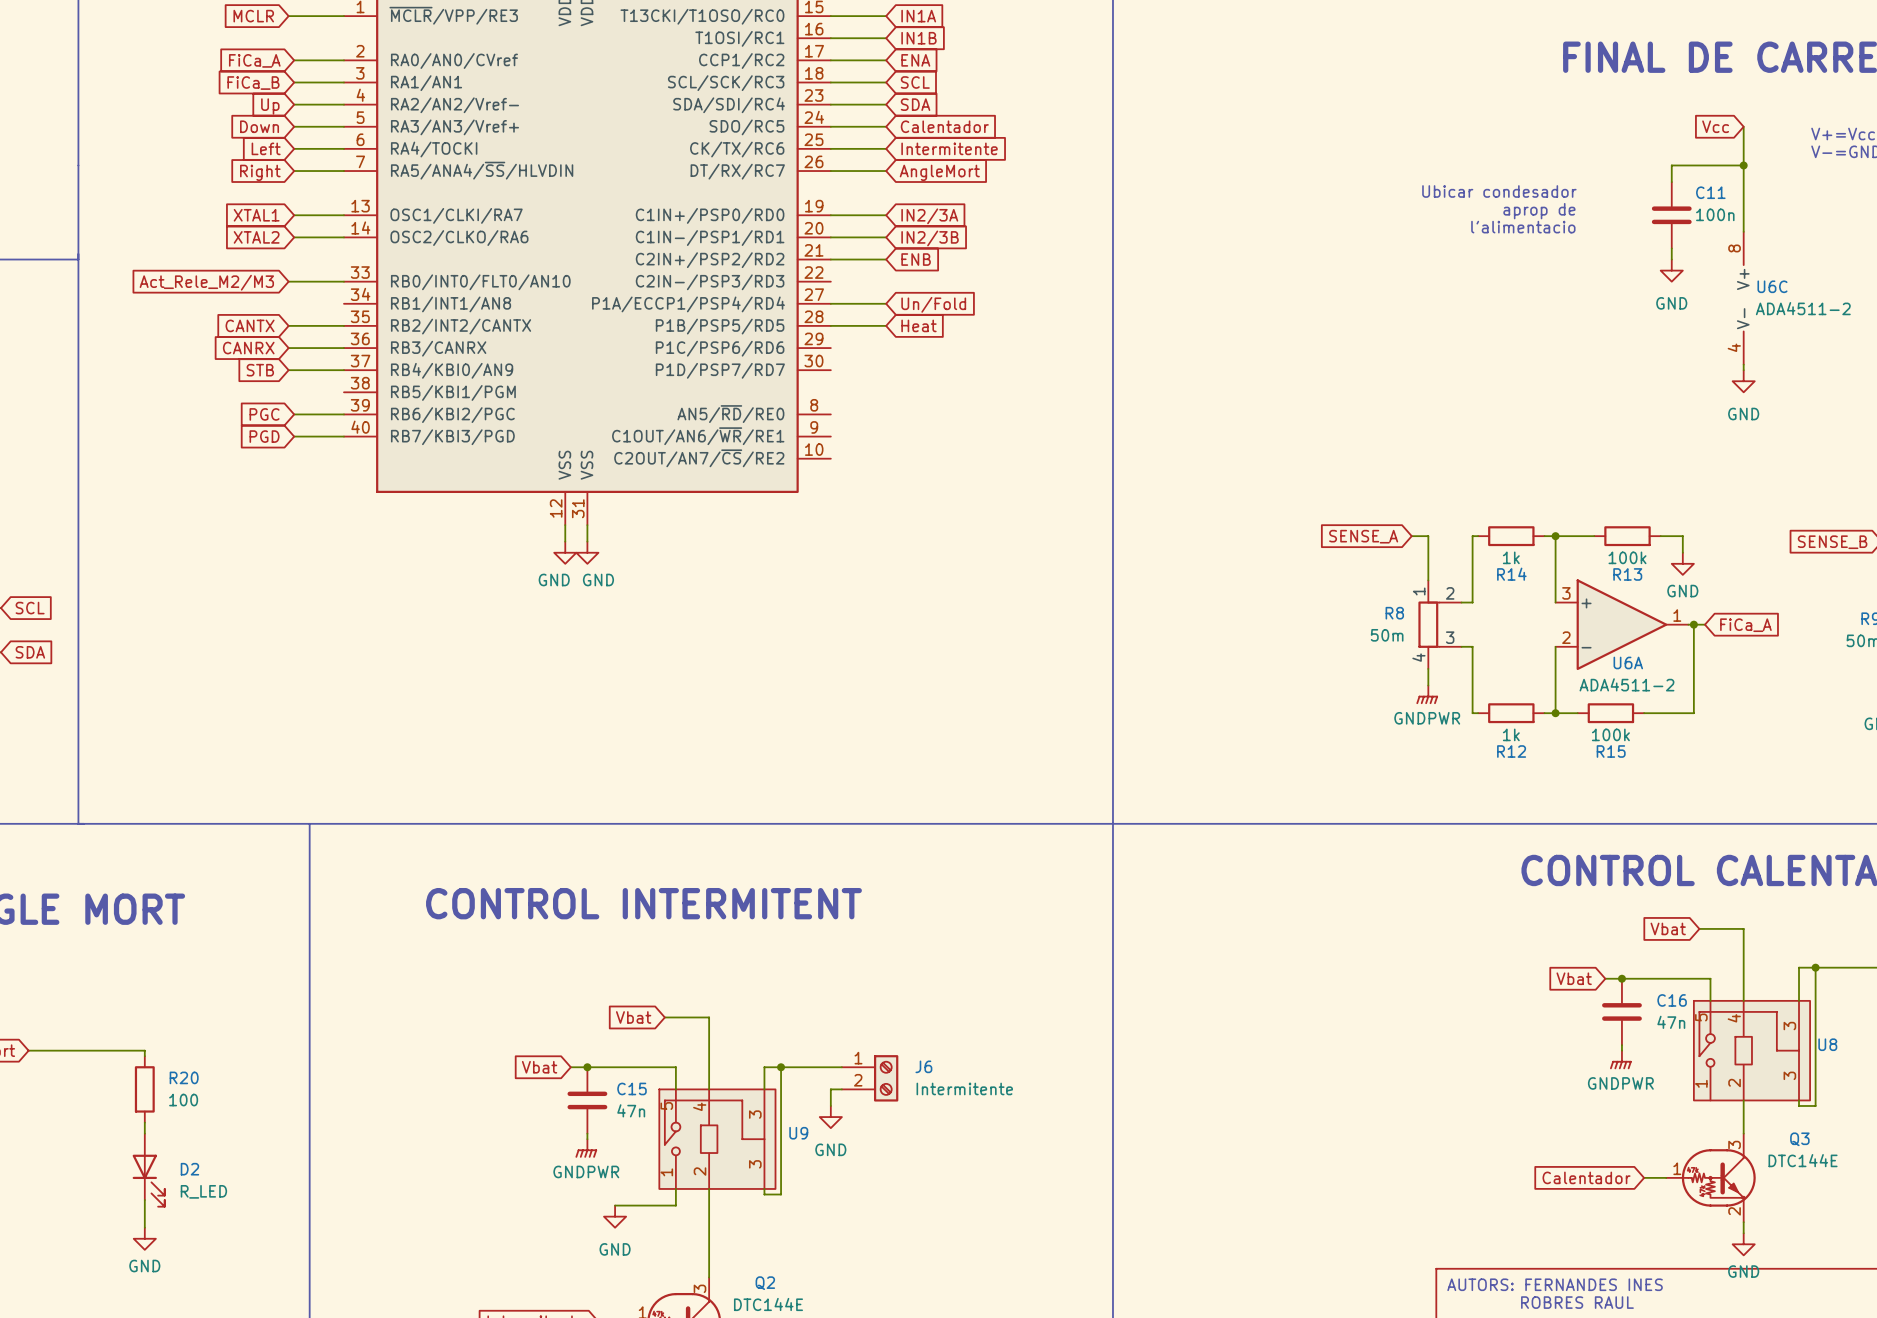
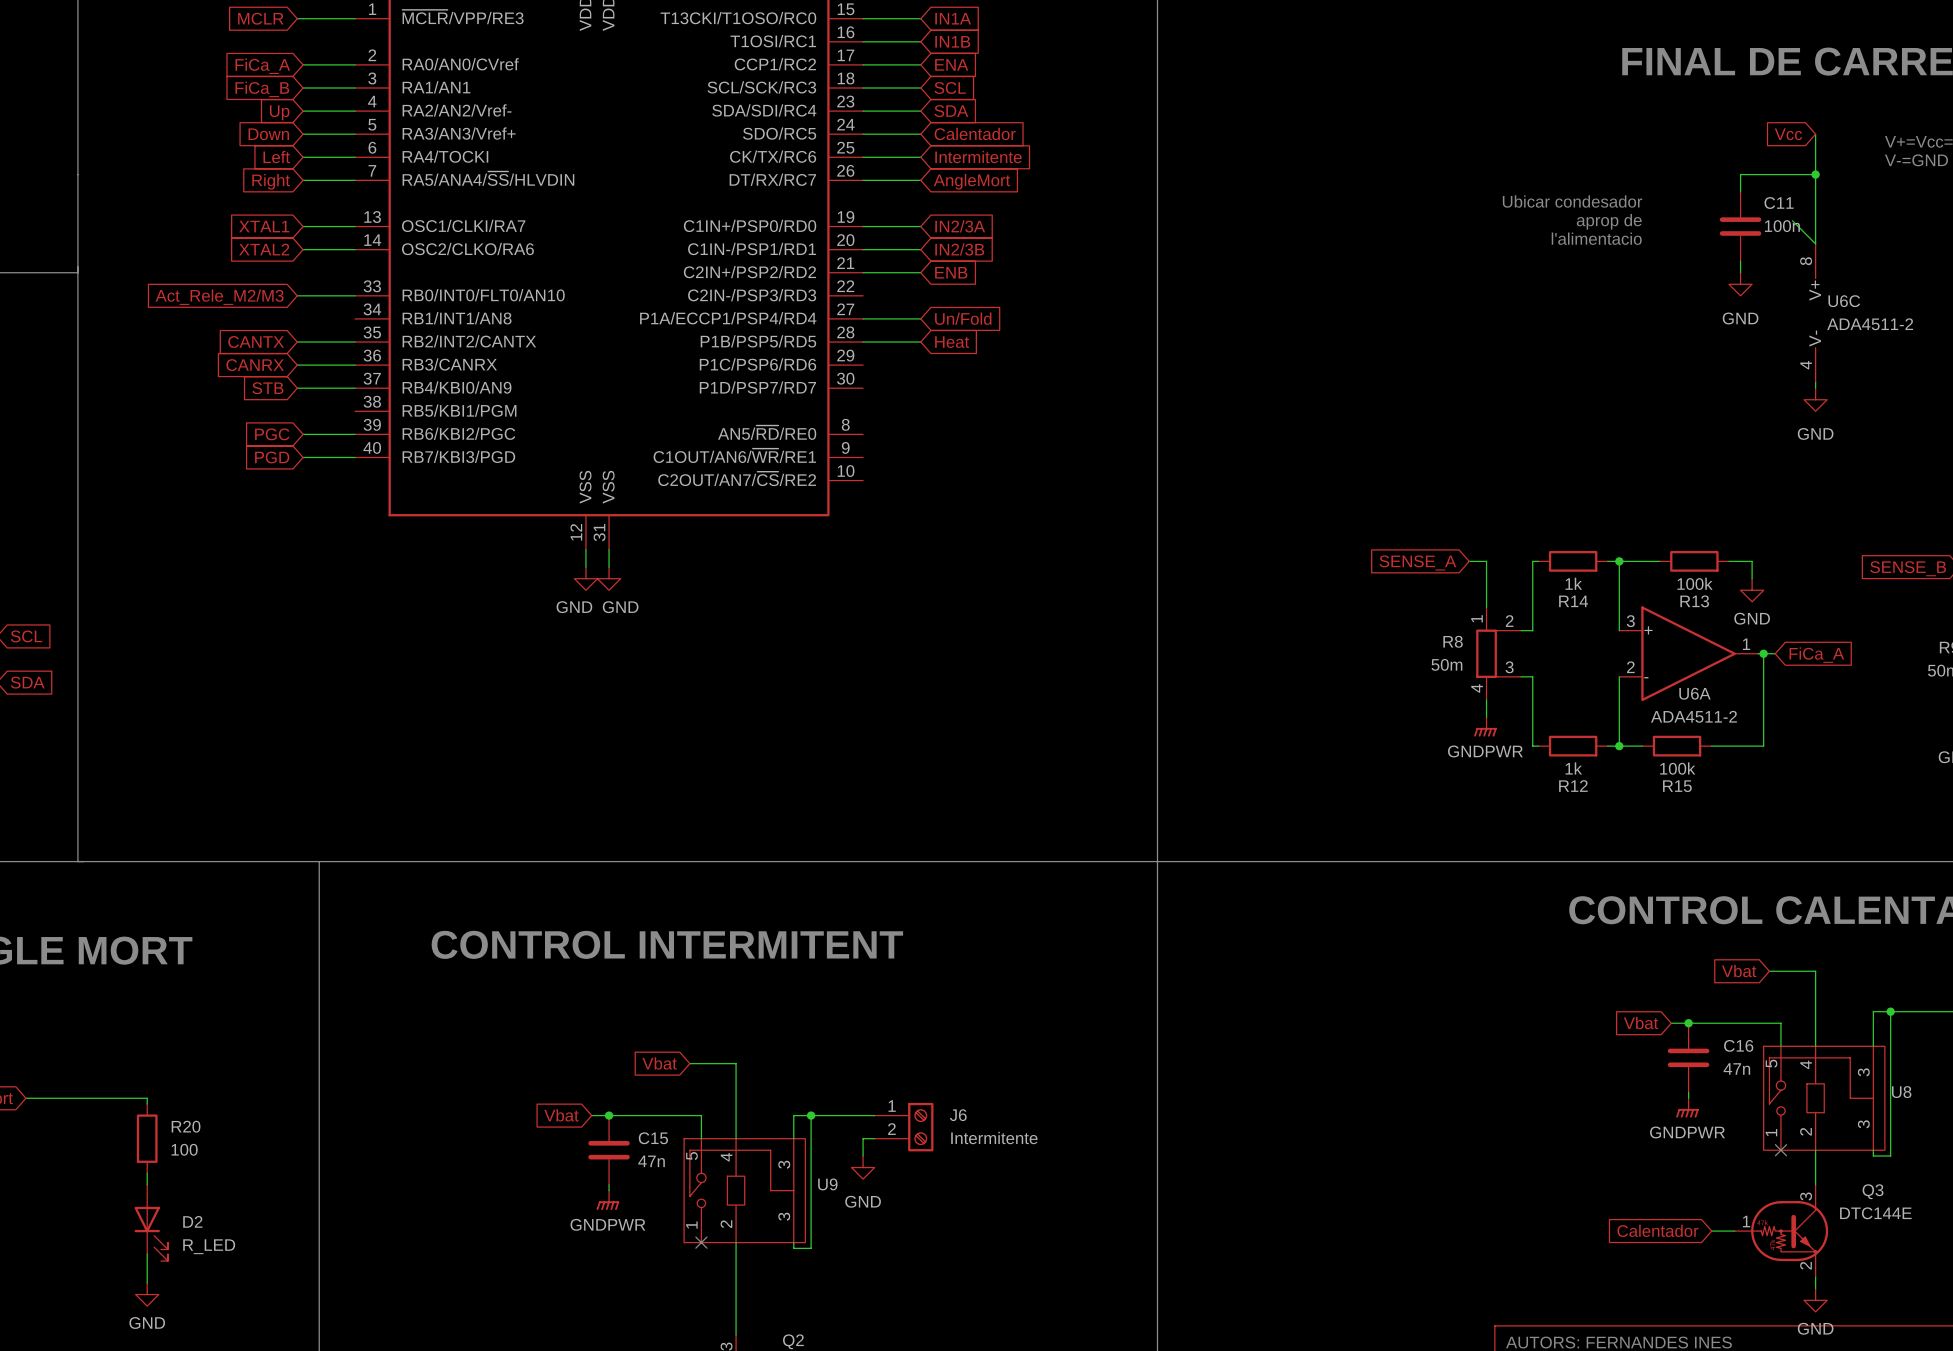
wire: none -> (1792, 220) (1815, 243)
no-connect mark: none -> (1780, 1150)
wire: (675, 1188) (675, 1205) (615, 1205) -> none
no-connect mark: none -> (701, 1242)
power symbol: GND (615, 1216) -> none

